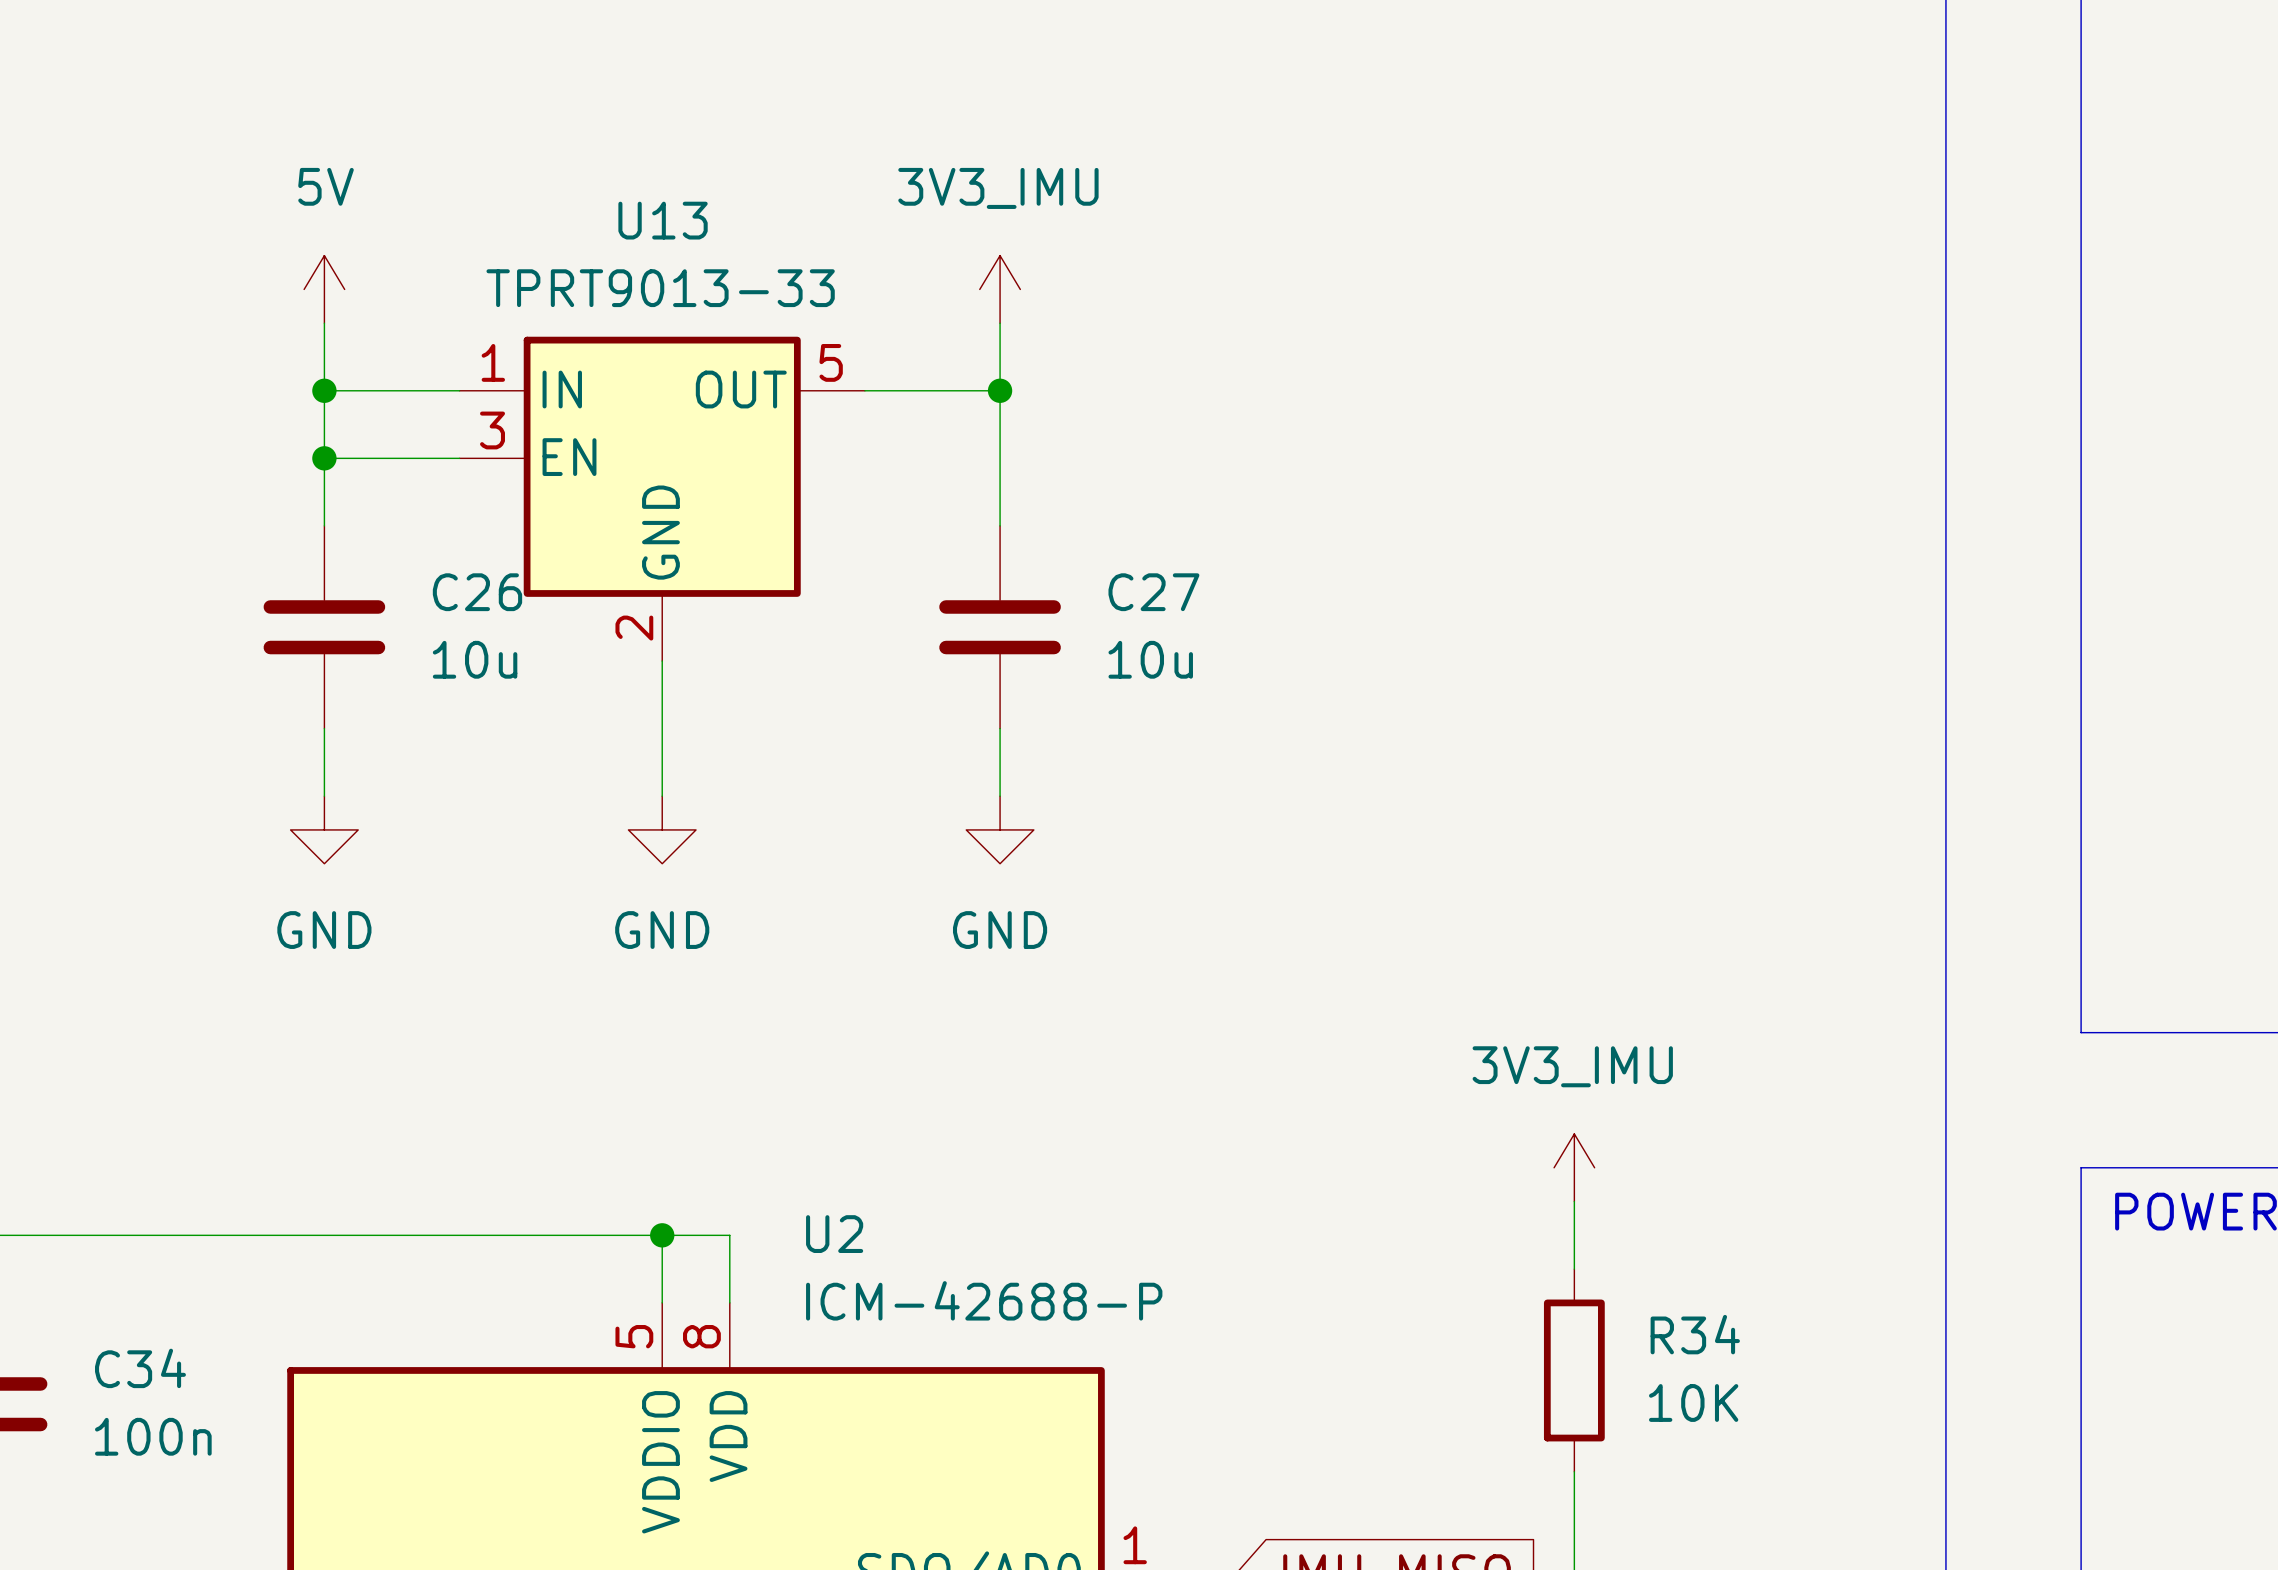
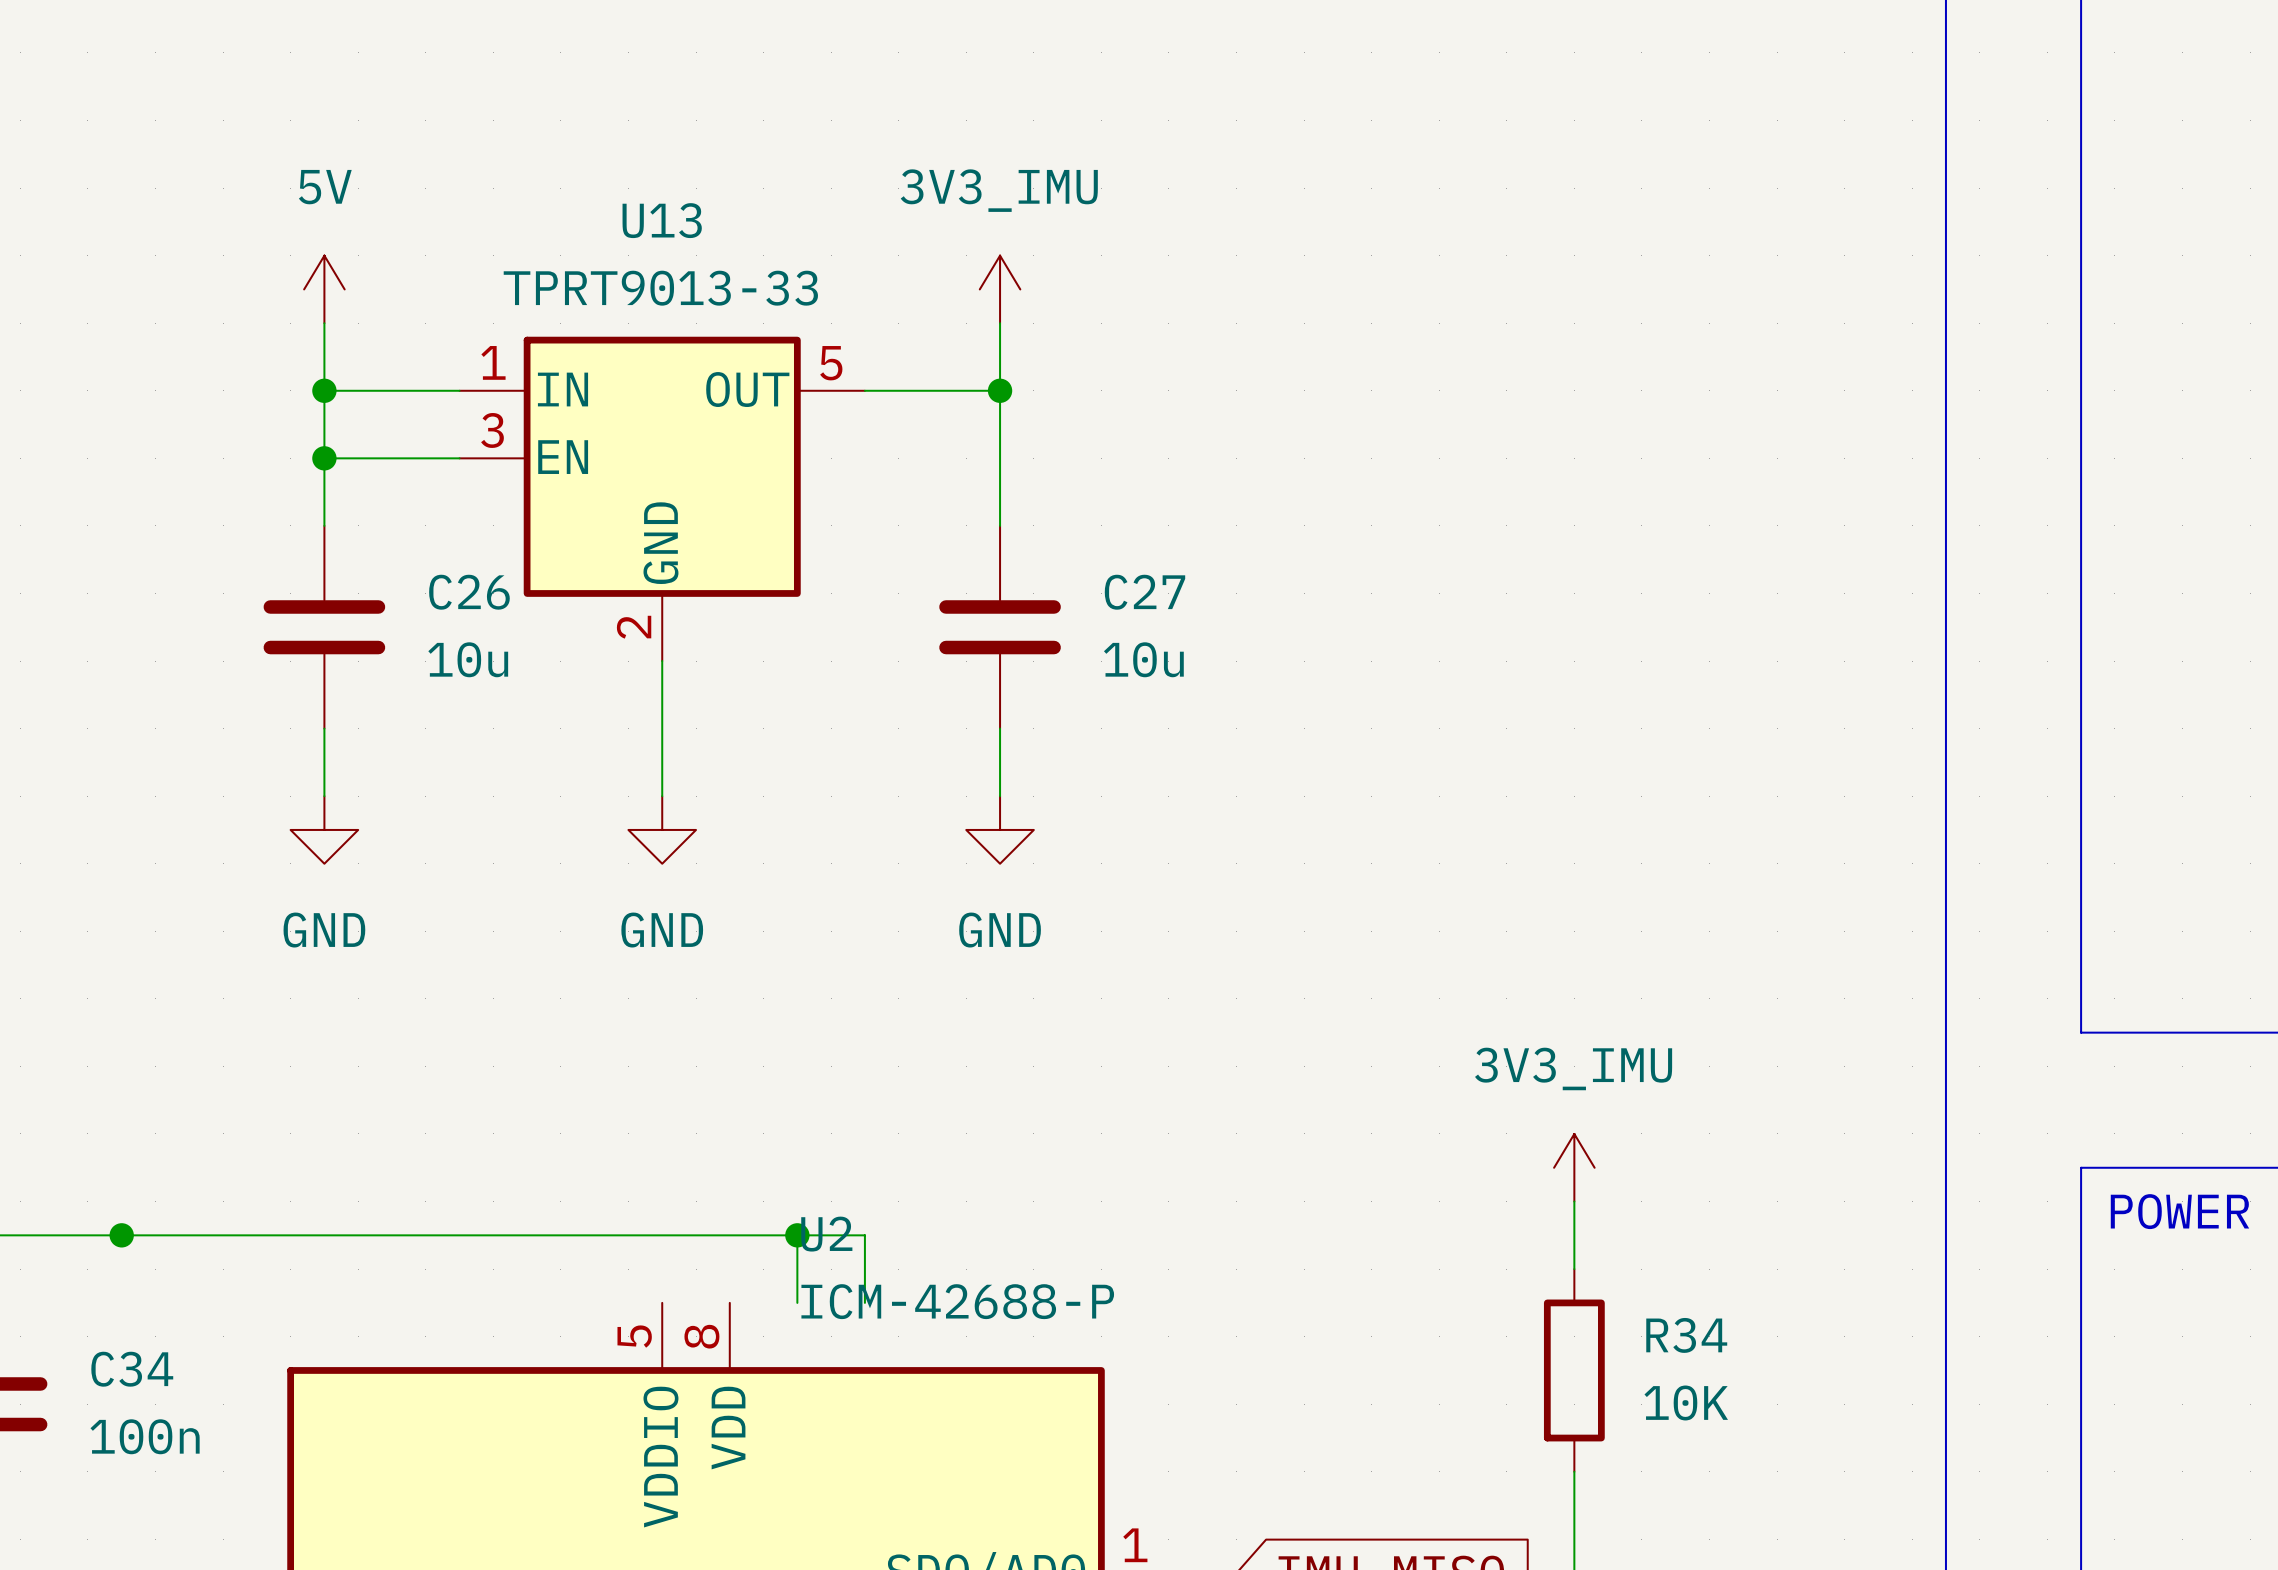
junction: none -> (121, 1235)
wire: (662, 1235) (662, 1302) -> (797, 1235) (797, 1302)
junction position: (662, 1235) -> (797, 1235)
wire: (729, 1235) (729, 1302) -> (729, 1235) (864, 1235) (864, 1302)

